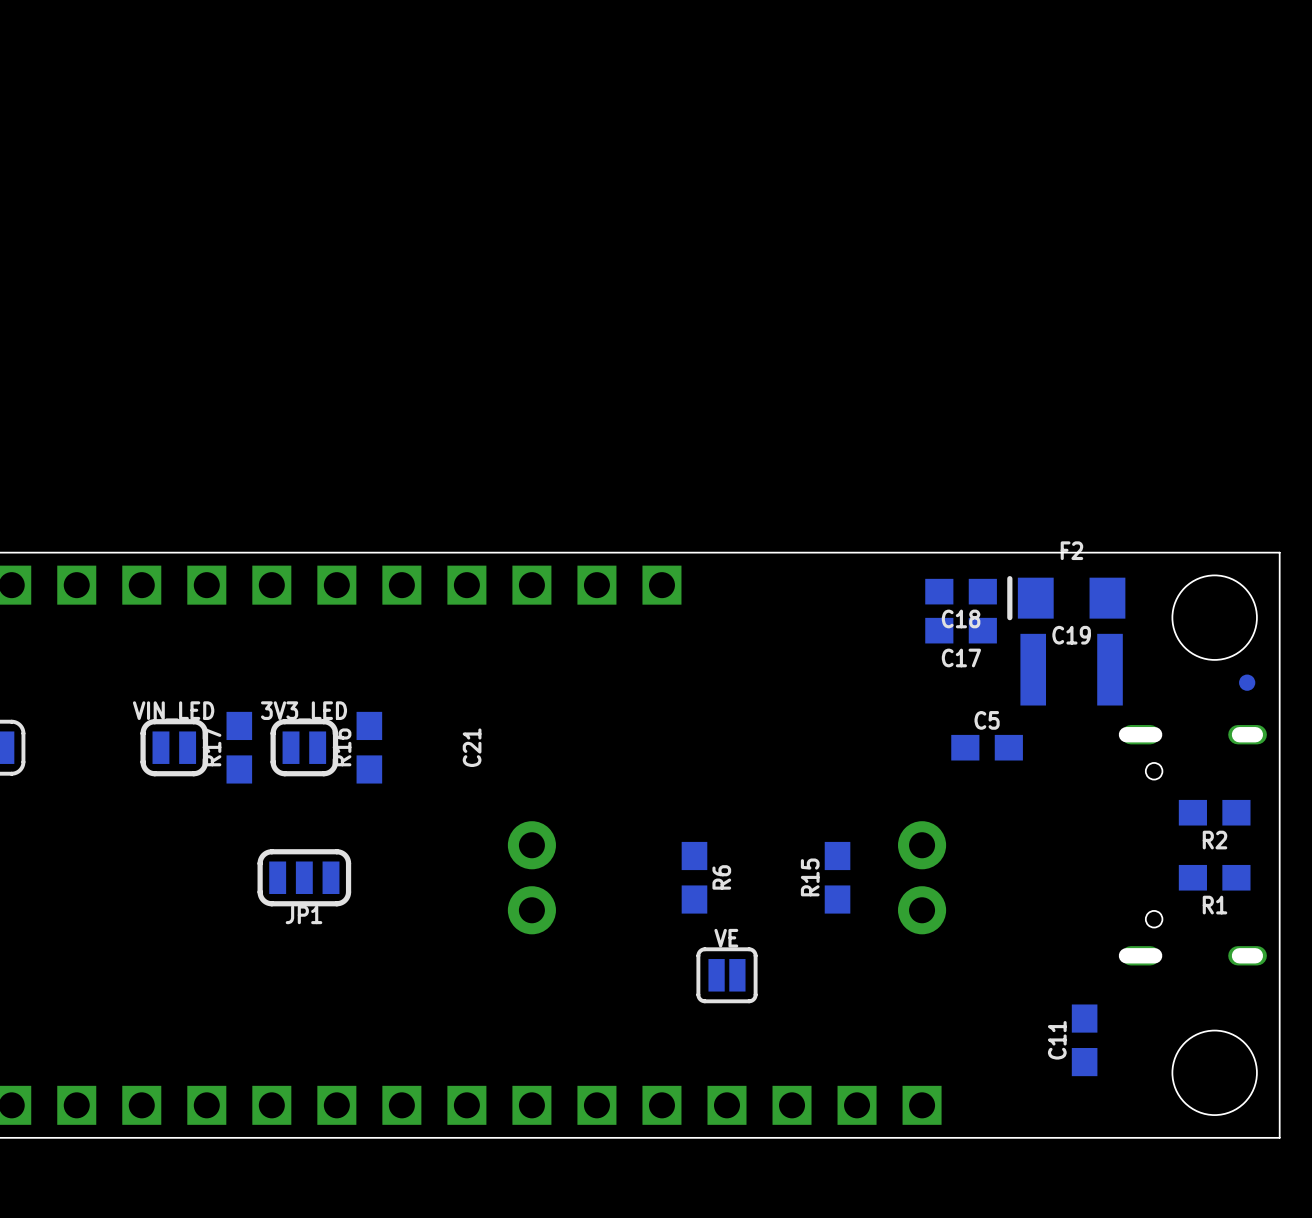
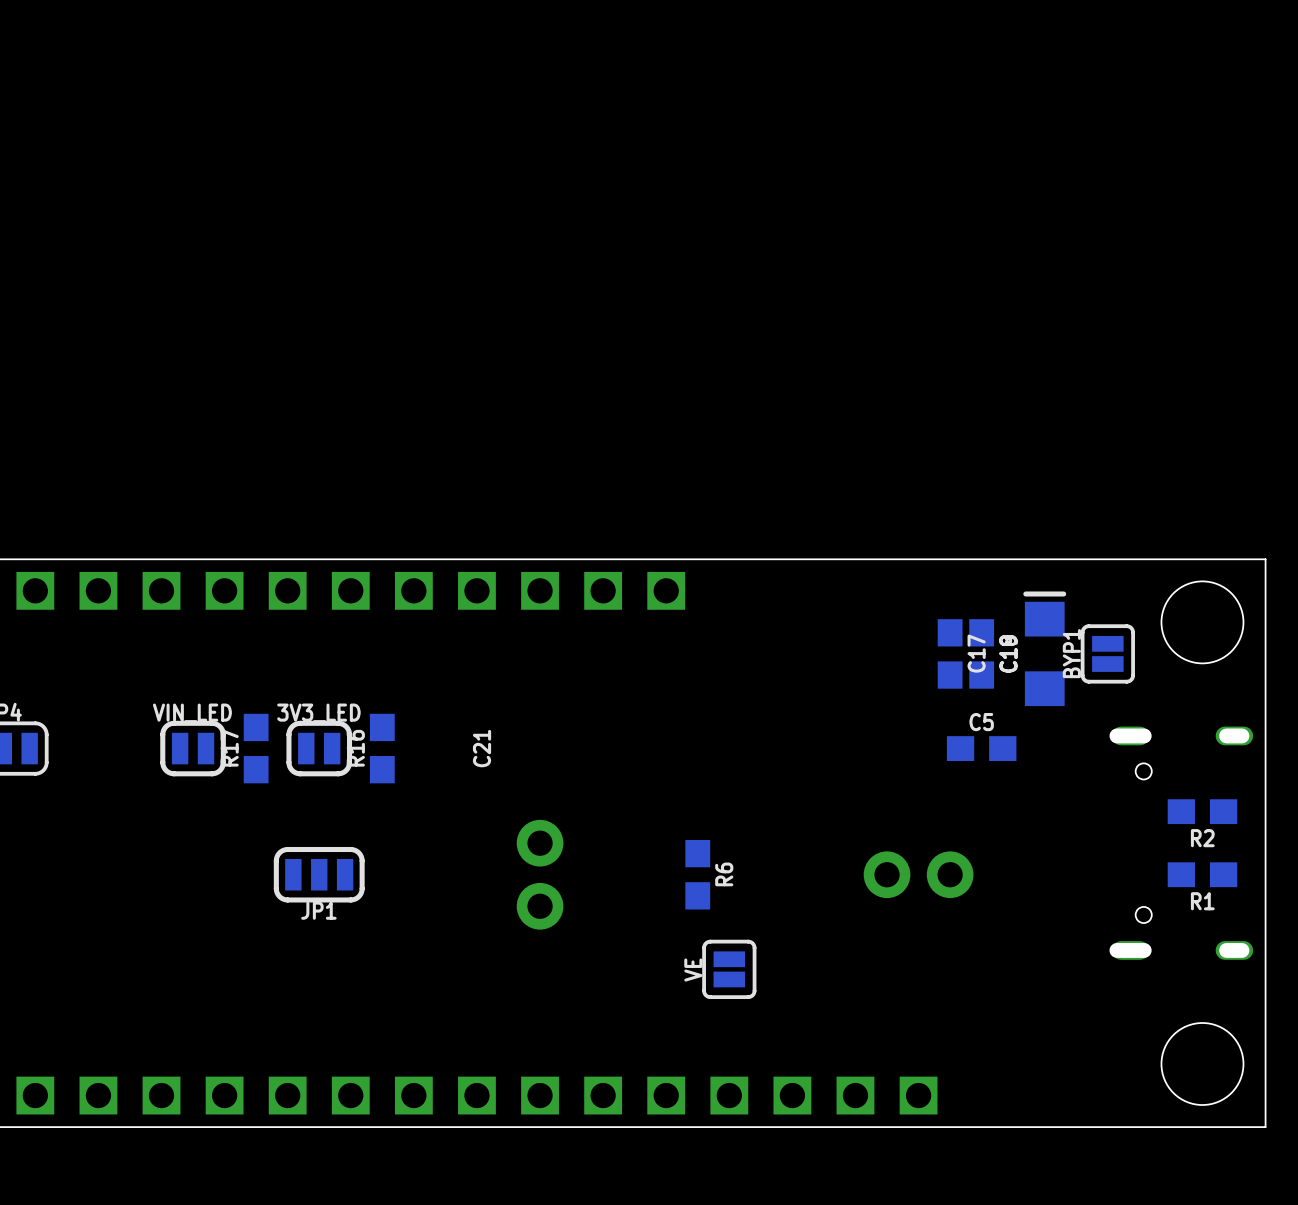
C18 rotation: 0° (961, 591) -> 90° clockwise (981, 653)
C18 position: (961, 591) -> (981, 653)
C19 rotation: 0° (1066, 598) -> 90° clockwise (1044, 648)
C17 rotation: 0° (961, 630) -> 90° clockwise (950, 653)
BYP1: none -> (1107, 653)
F2: (1071, 669) -> none
part: (1247, 682) -> none
R15: (837, 877) -> none
part rotation: 0° (922, 877) -> 90° clockwise (918, 874)
VE name position: VE (726, 938) -> VE (693, 970)
VE rotation: 0° (726, 975) -> 90° clockwise (729, 969)
C11: (1084, 1040) -> none

